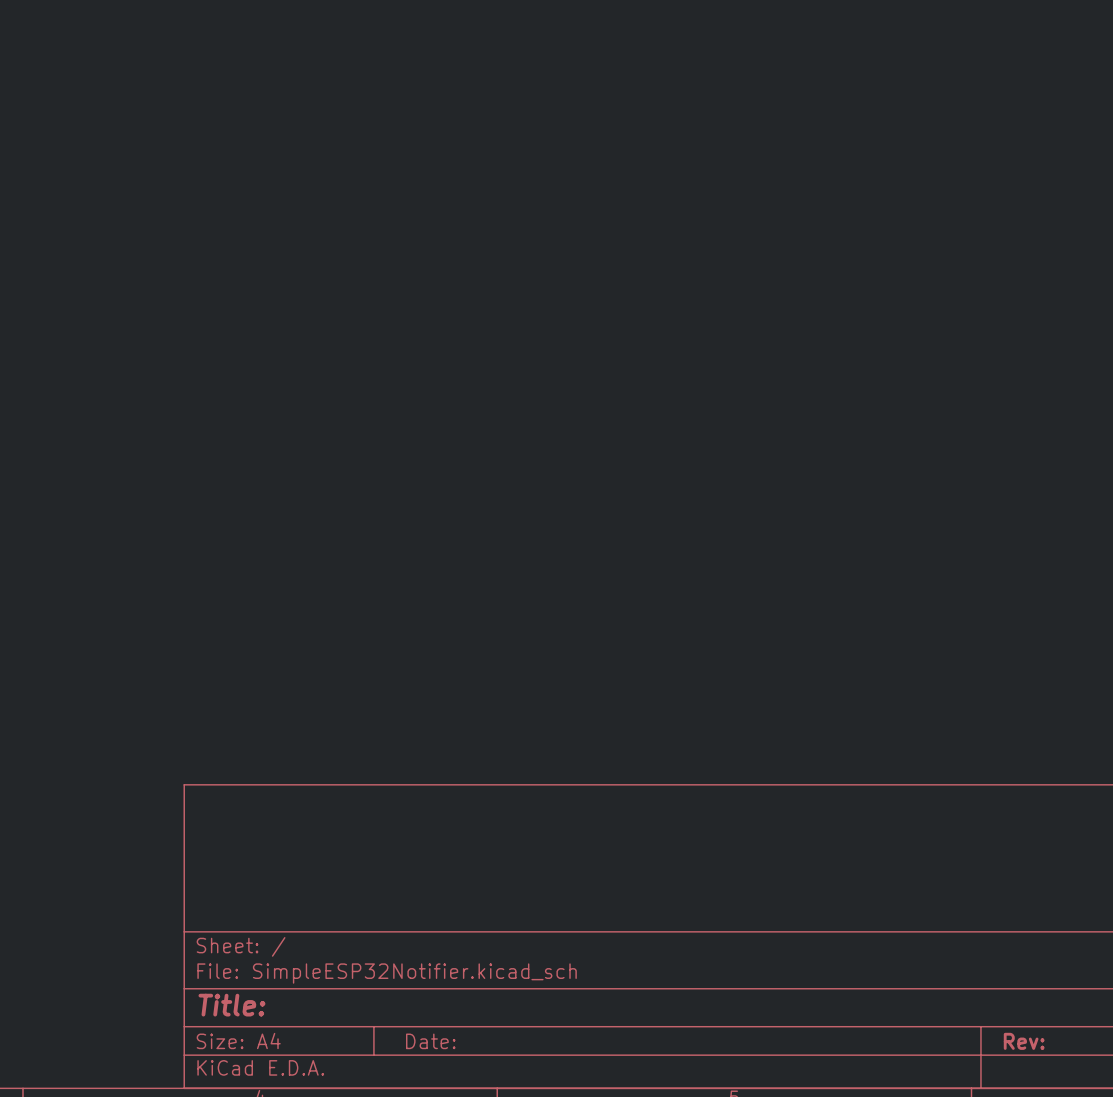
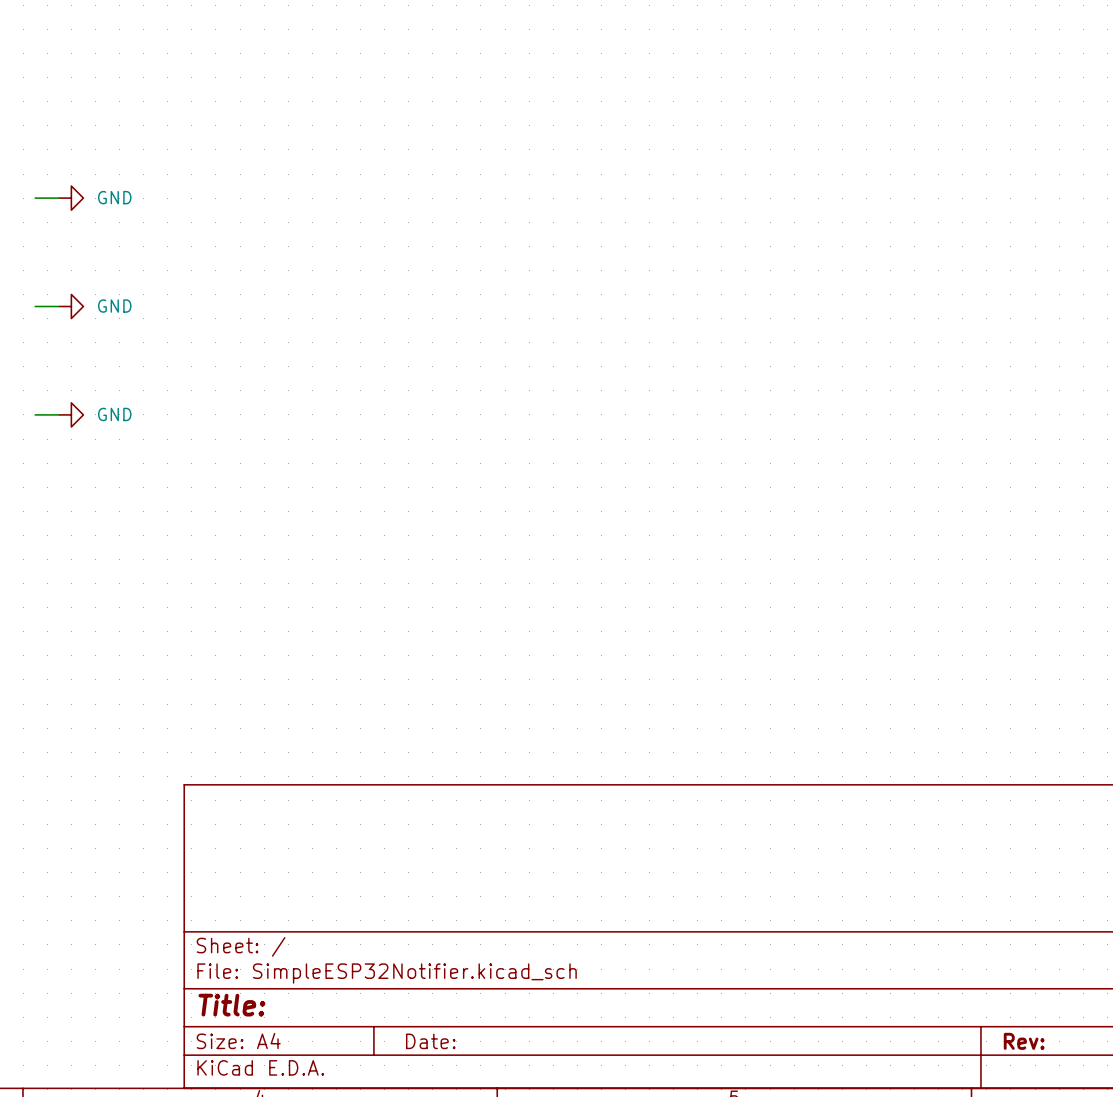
wire: none -> (35, 198) (59, 198)
power symbol: none -> GND (71, 198)
wire: none -> (35, 306) (59, 306)
power symbol: none -> GND (71, 306)
wire: none -> (35, 414) (59, 414)
power symbol: none -> GND (71, 414)

